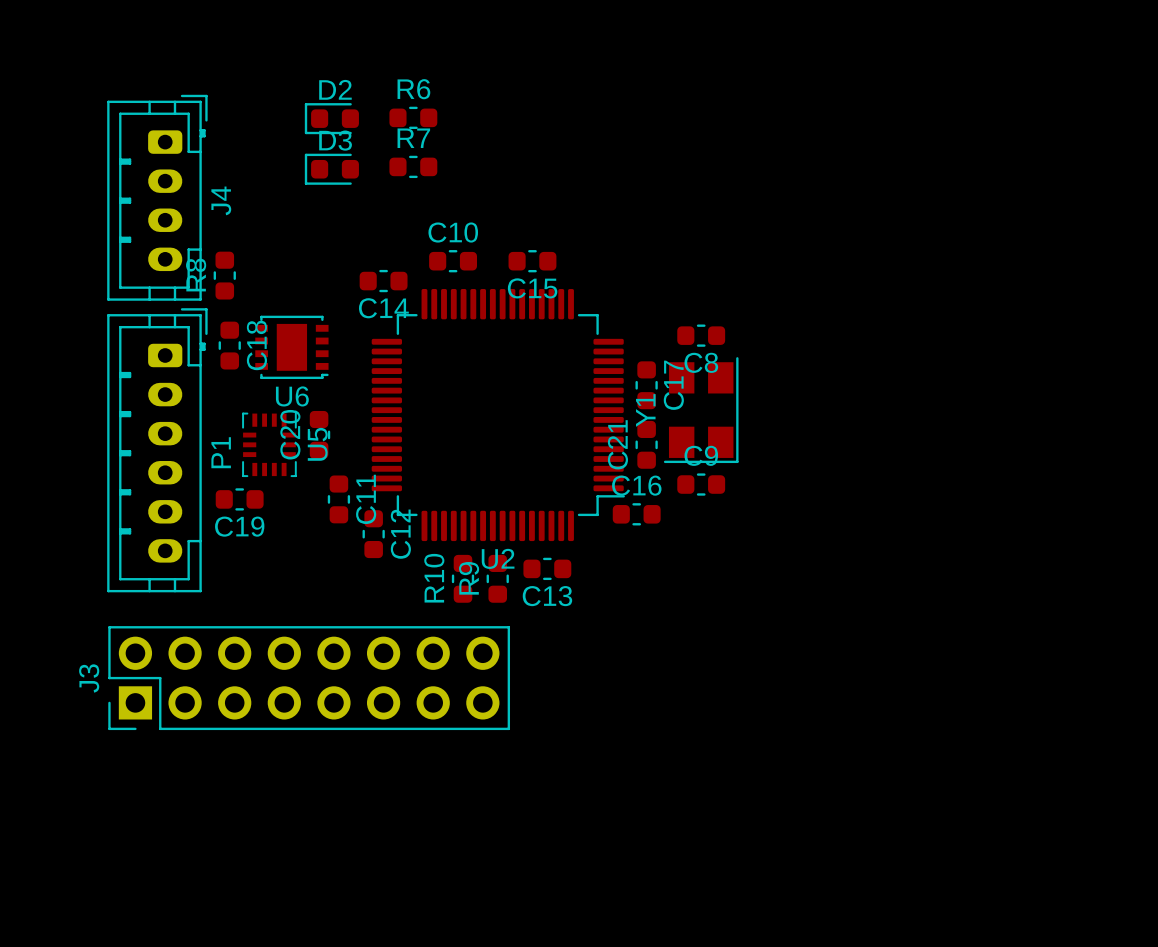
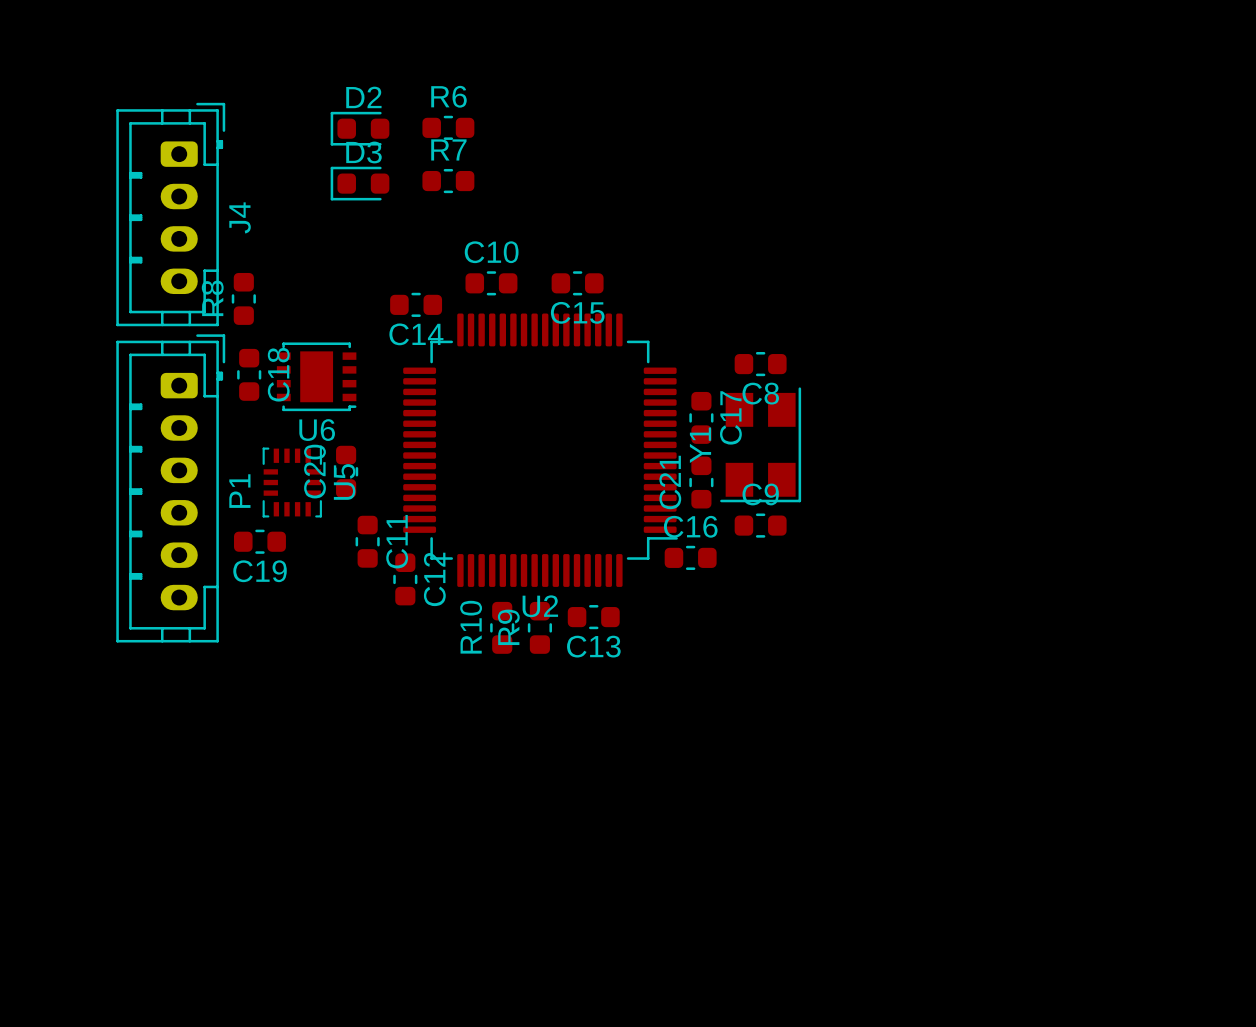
J3: (309, 678) -> none

